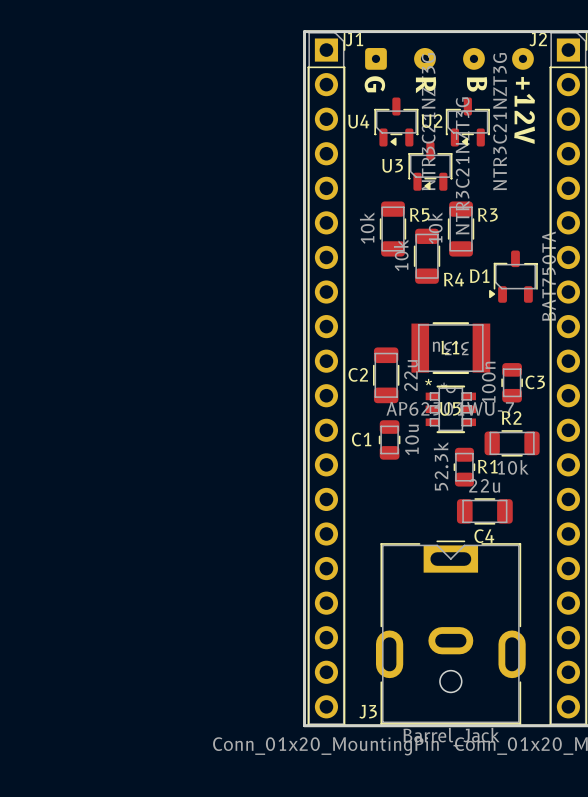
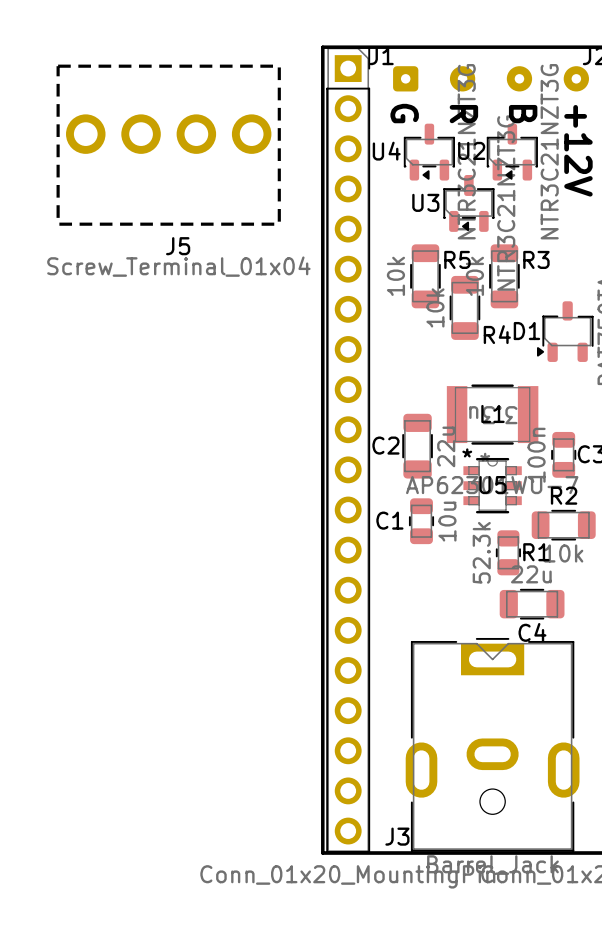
J5: none -> Screw_Terminal_01x04 (168, 145)

